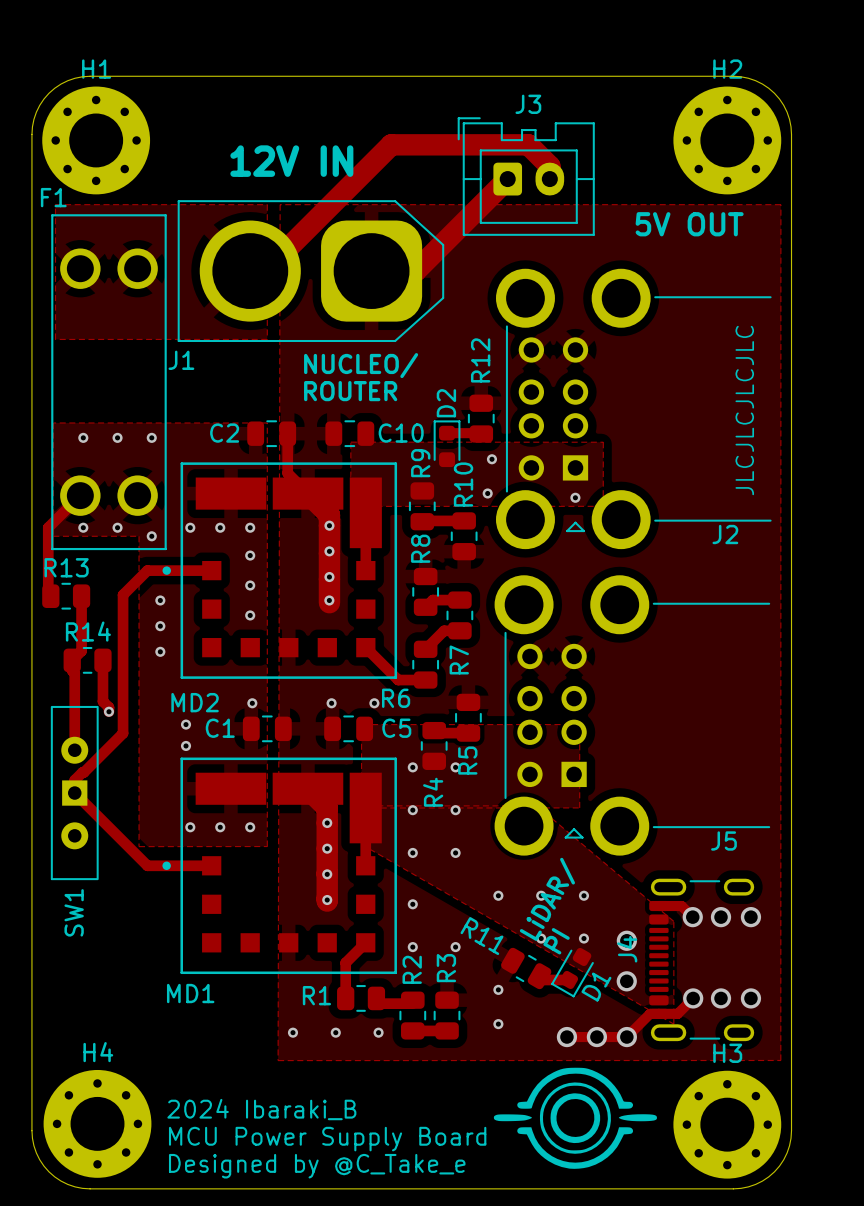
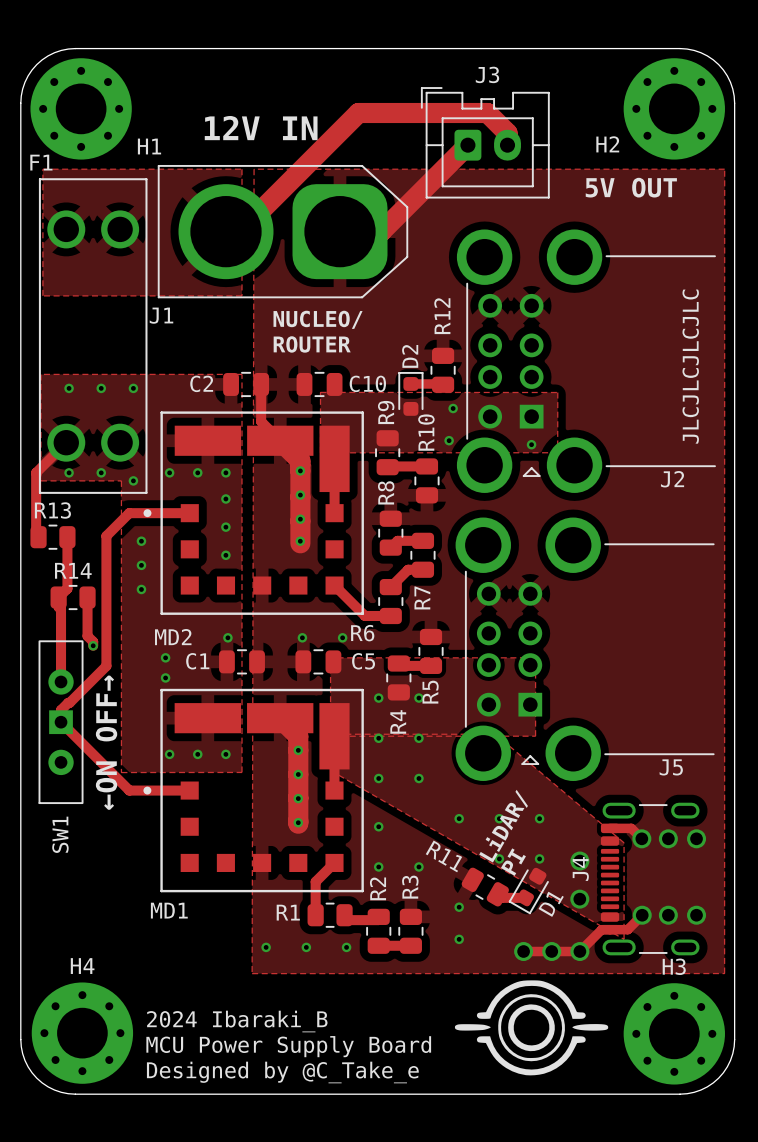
H1 name position: H1 (96, 69) -> H1 (149, 146)
H2 name position: H2 (727, 69) -> H2 (607, 144)
text: none -> ←ON OFF→ (106, 742)

